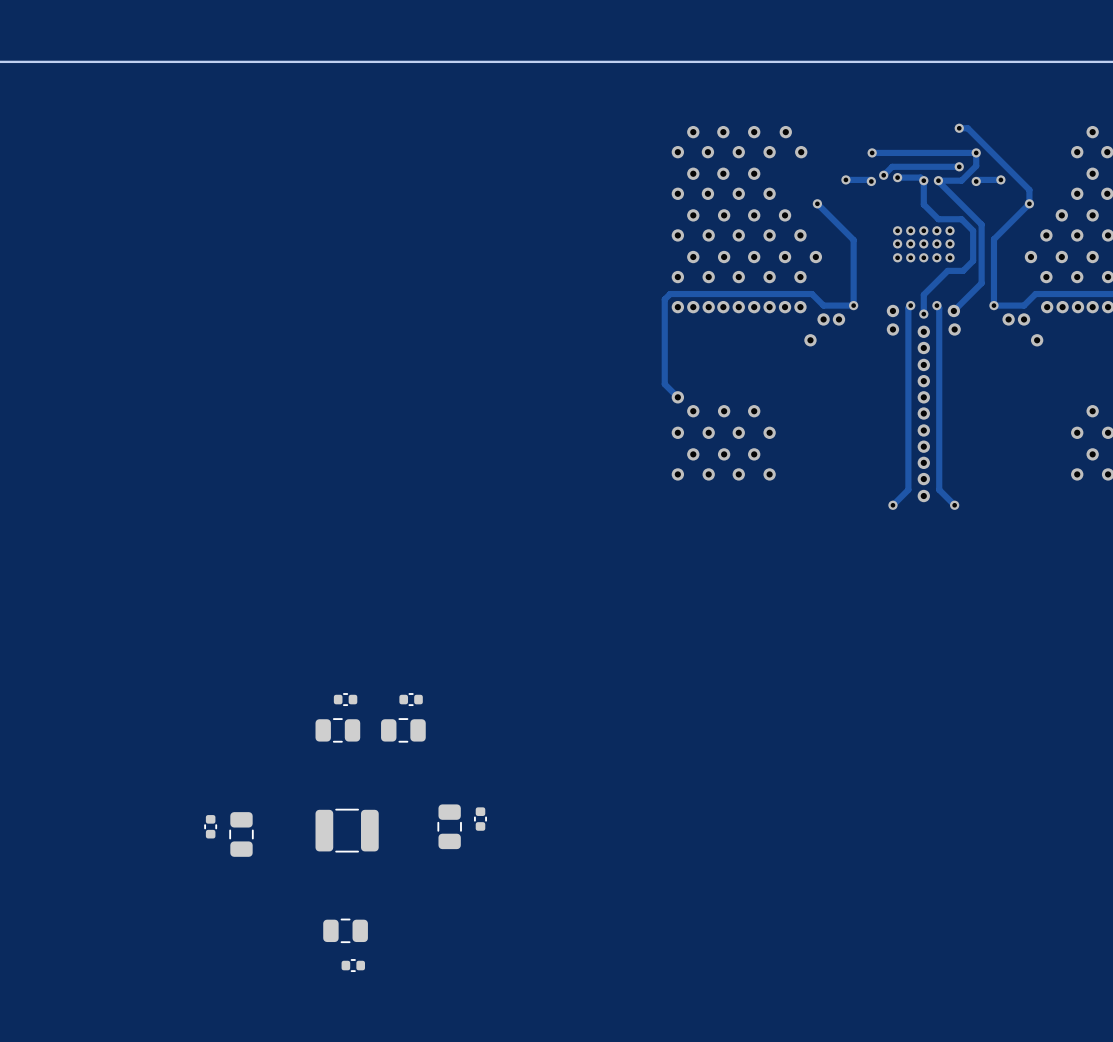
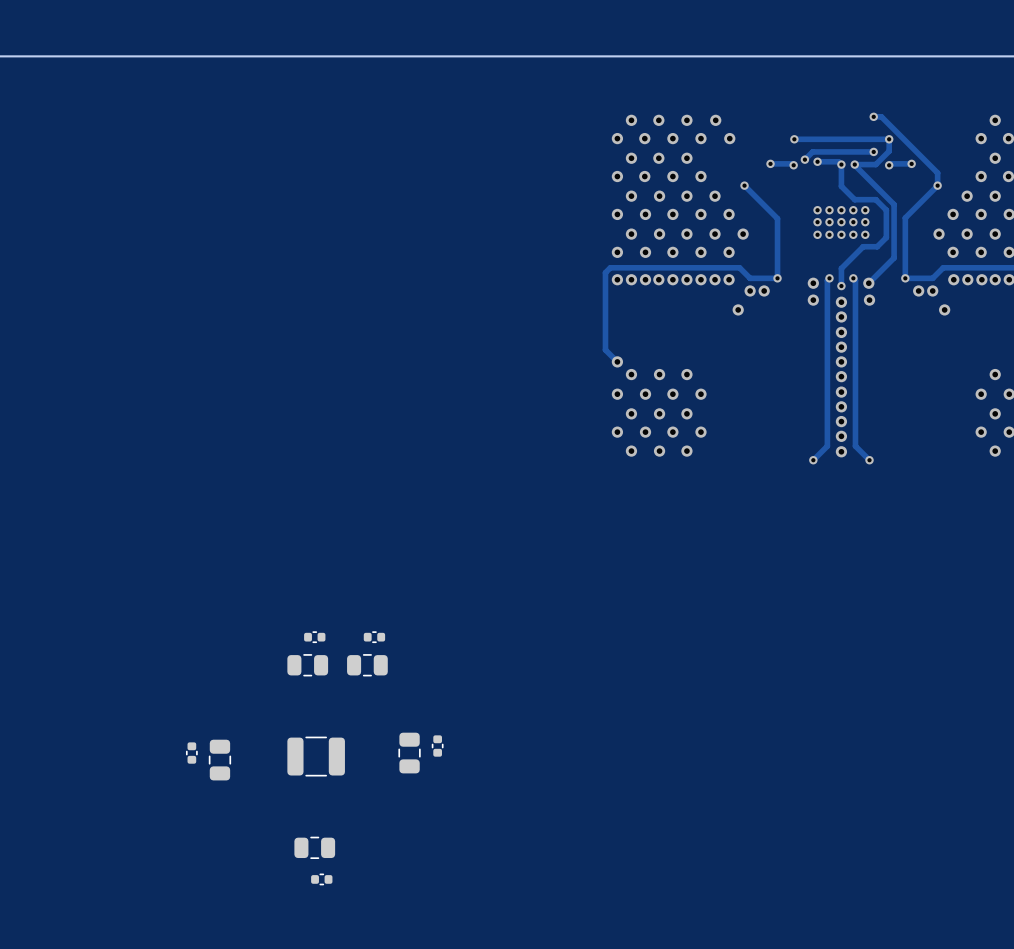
via: none -> (631, 451)
via: none -> (659, 451)
via: none -> (686, 451)
via: none -> (995, 451)

